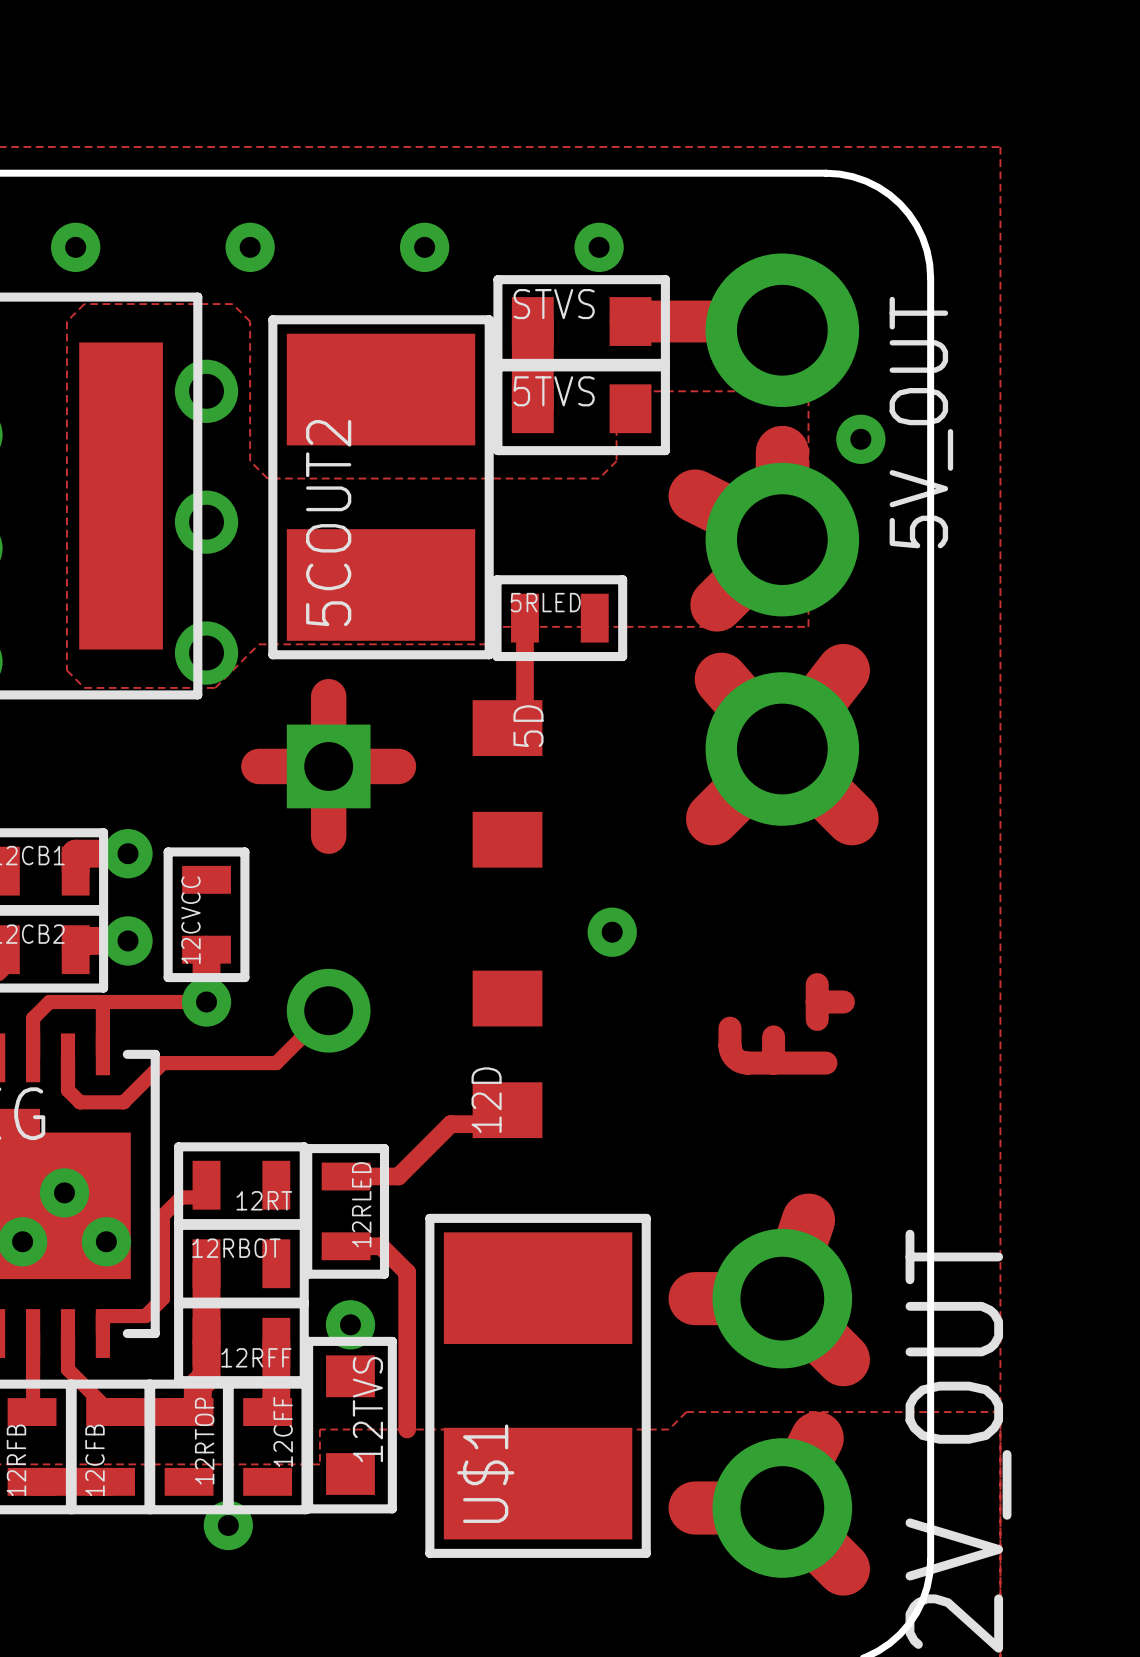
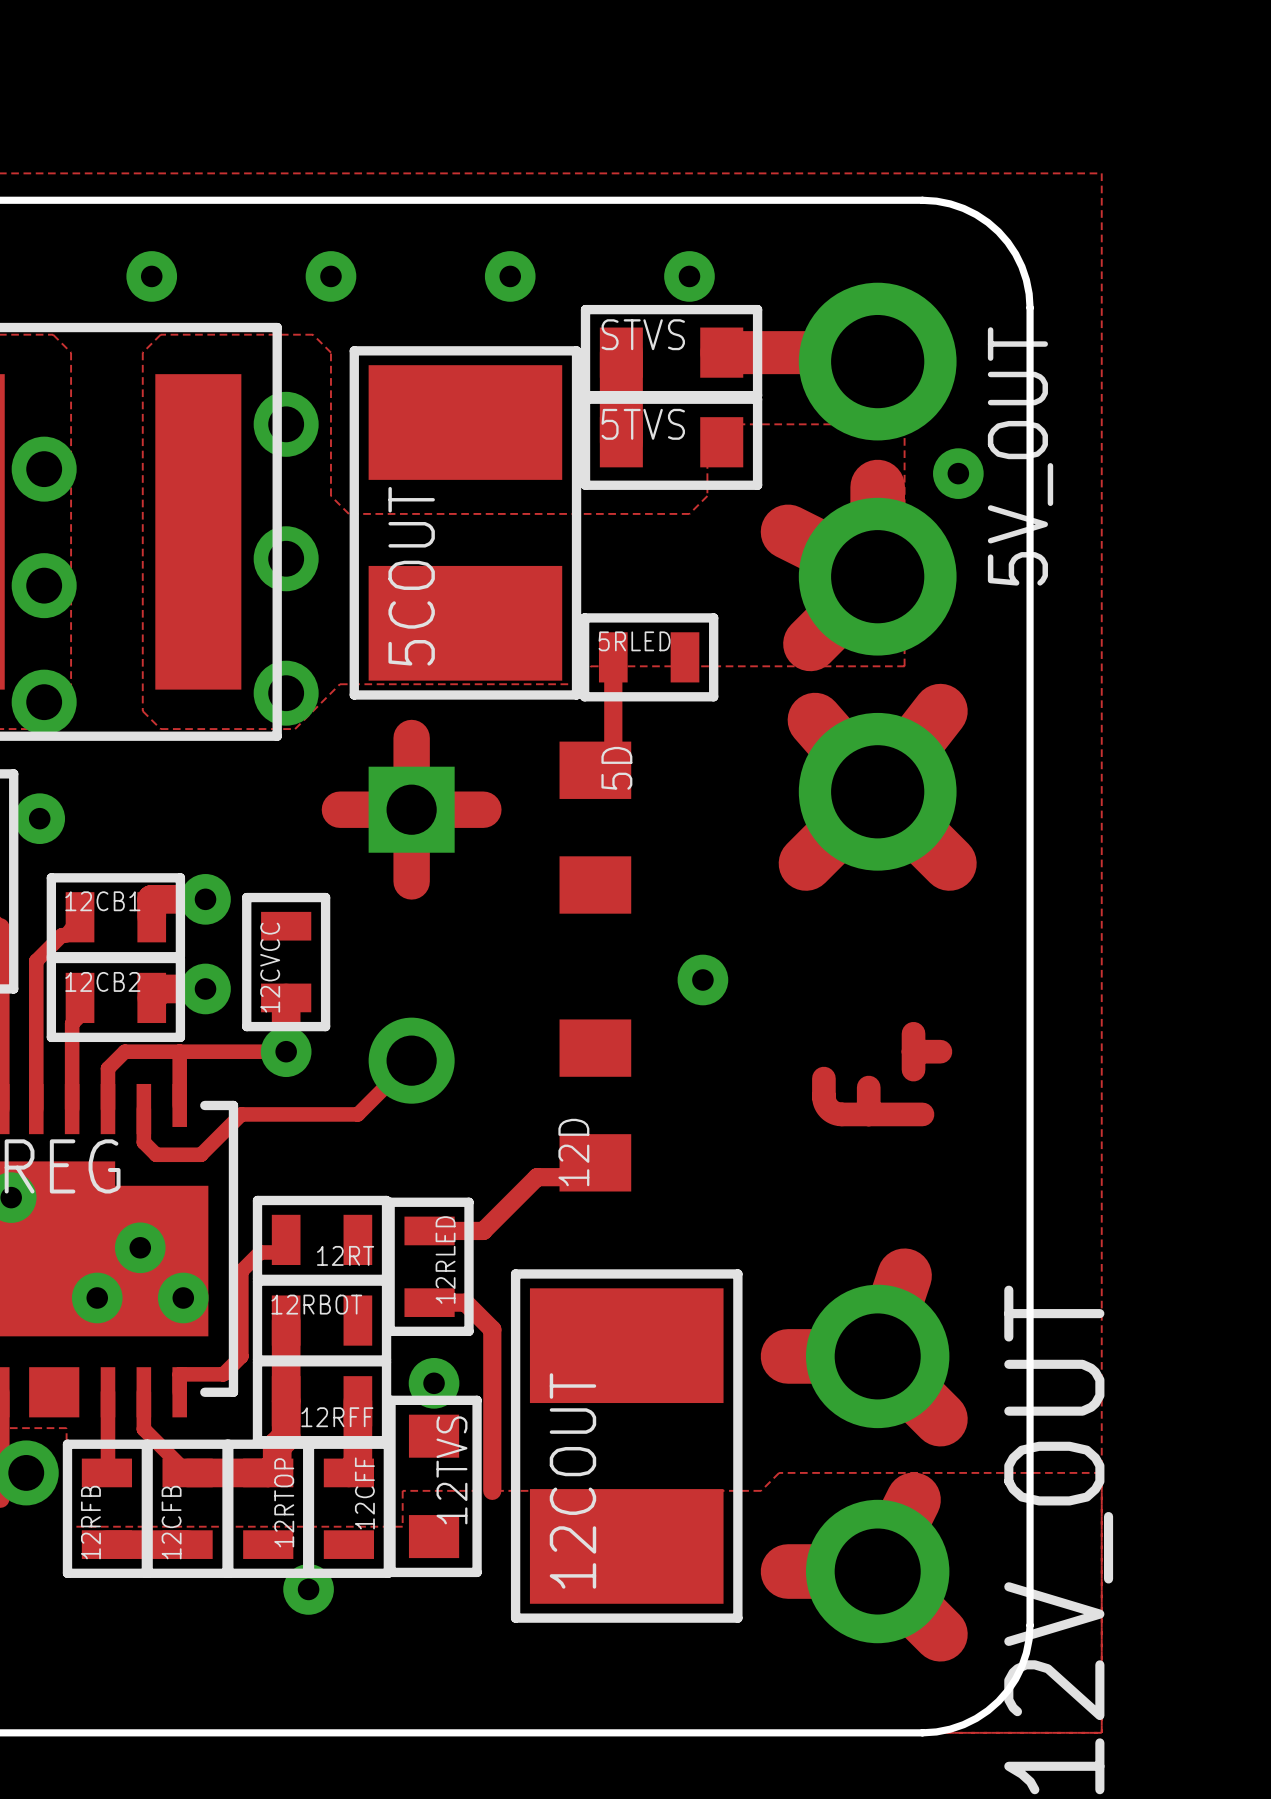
5COUT2 name: 5COUT2 (328, 523) -> 5COUT (411, 576)
U$1 name: U$1 (485, 1473) -> 12COUT (572, 1480)

